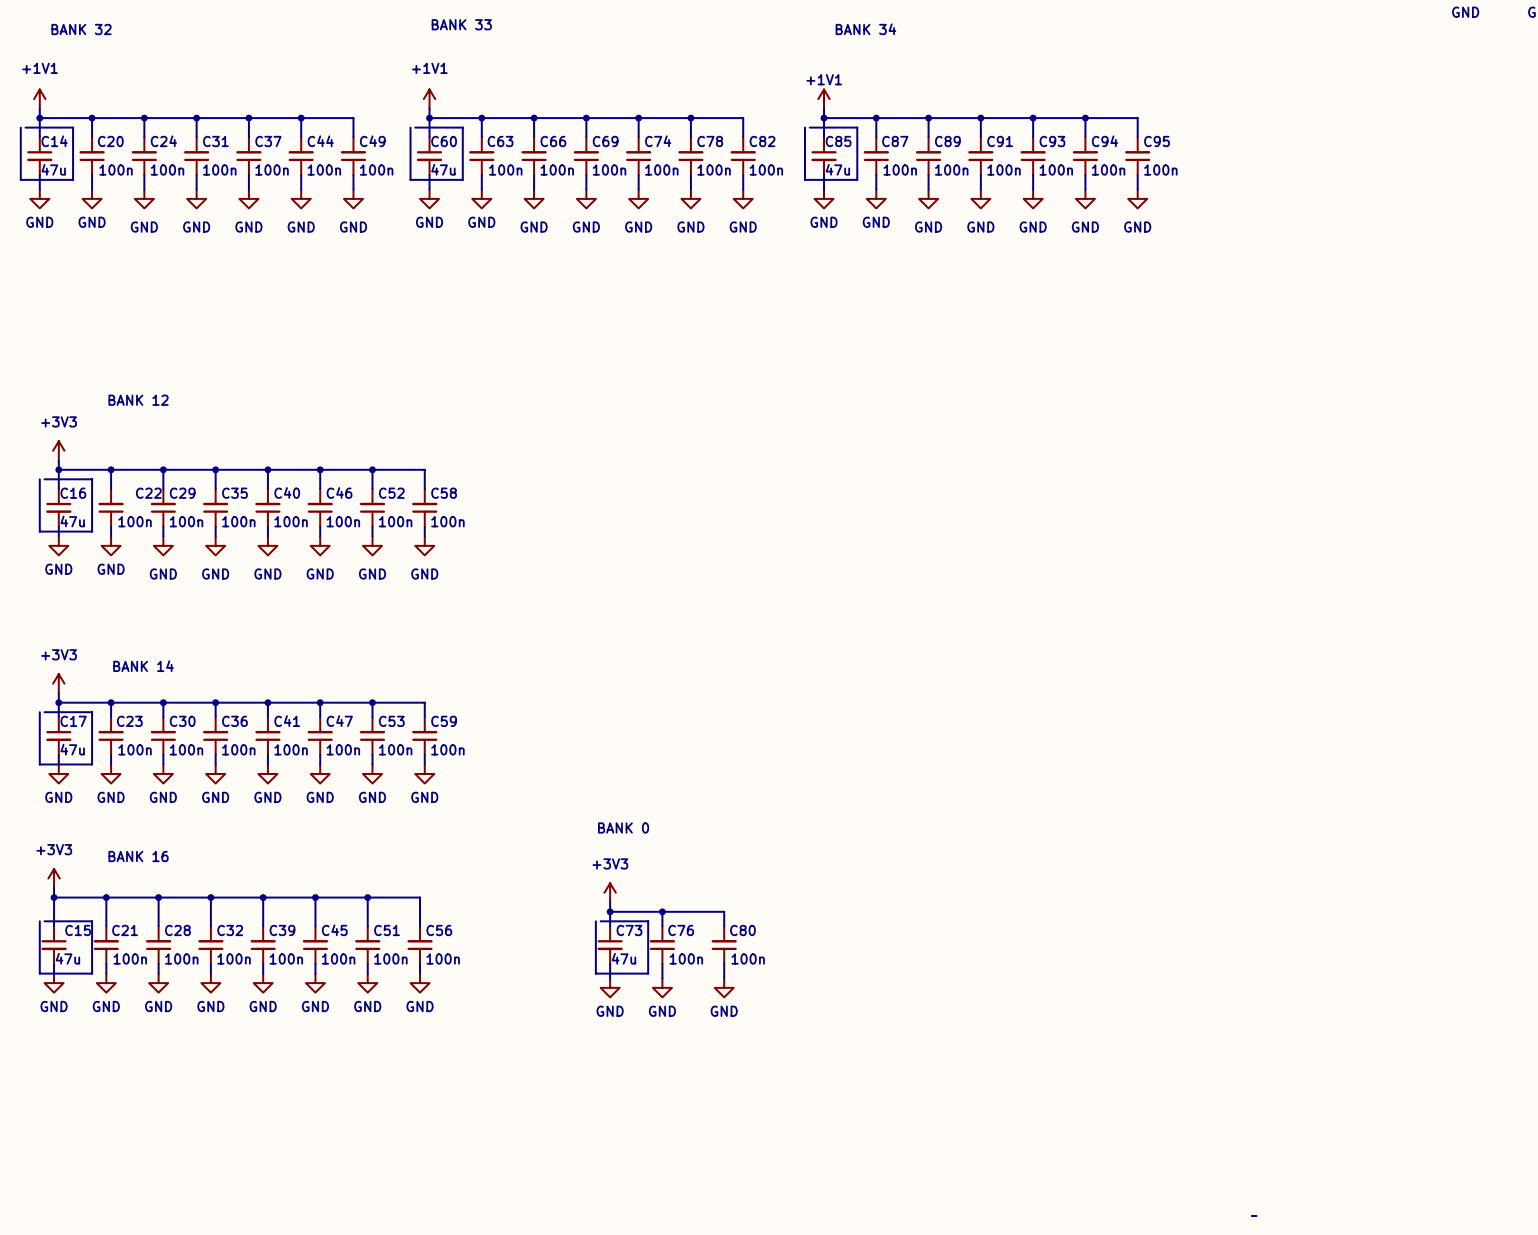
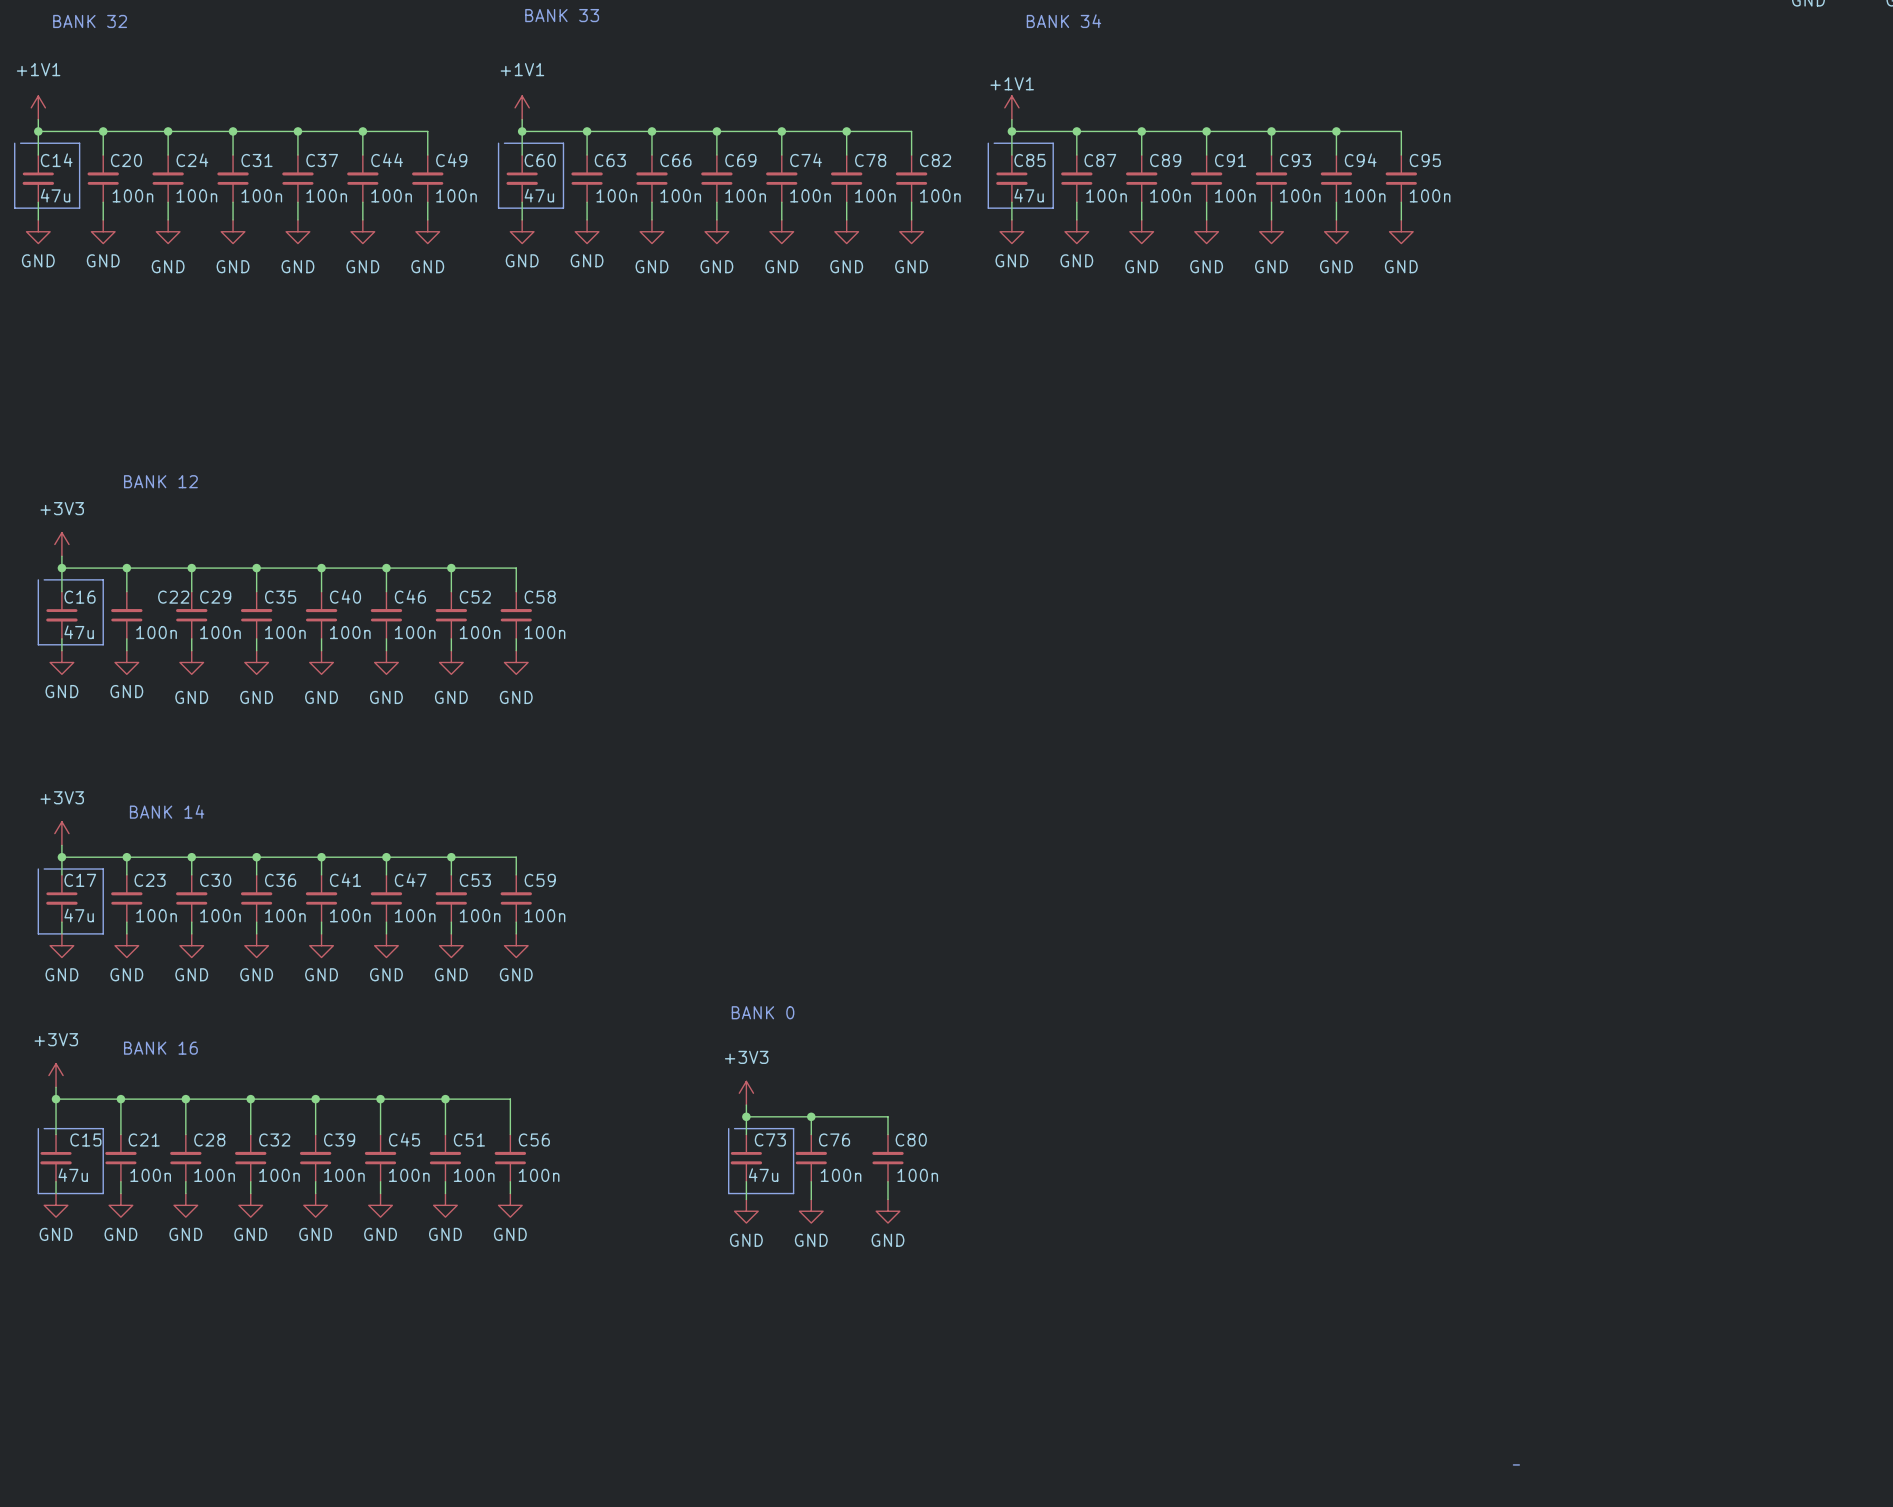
line: (1251, 1216) (1256, 1216) -> (1513, 1464) (1519, 1464)

